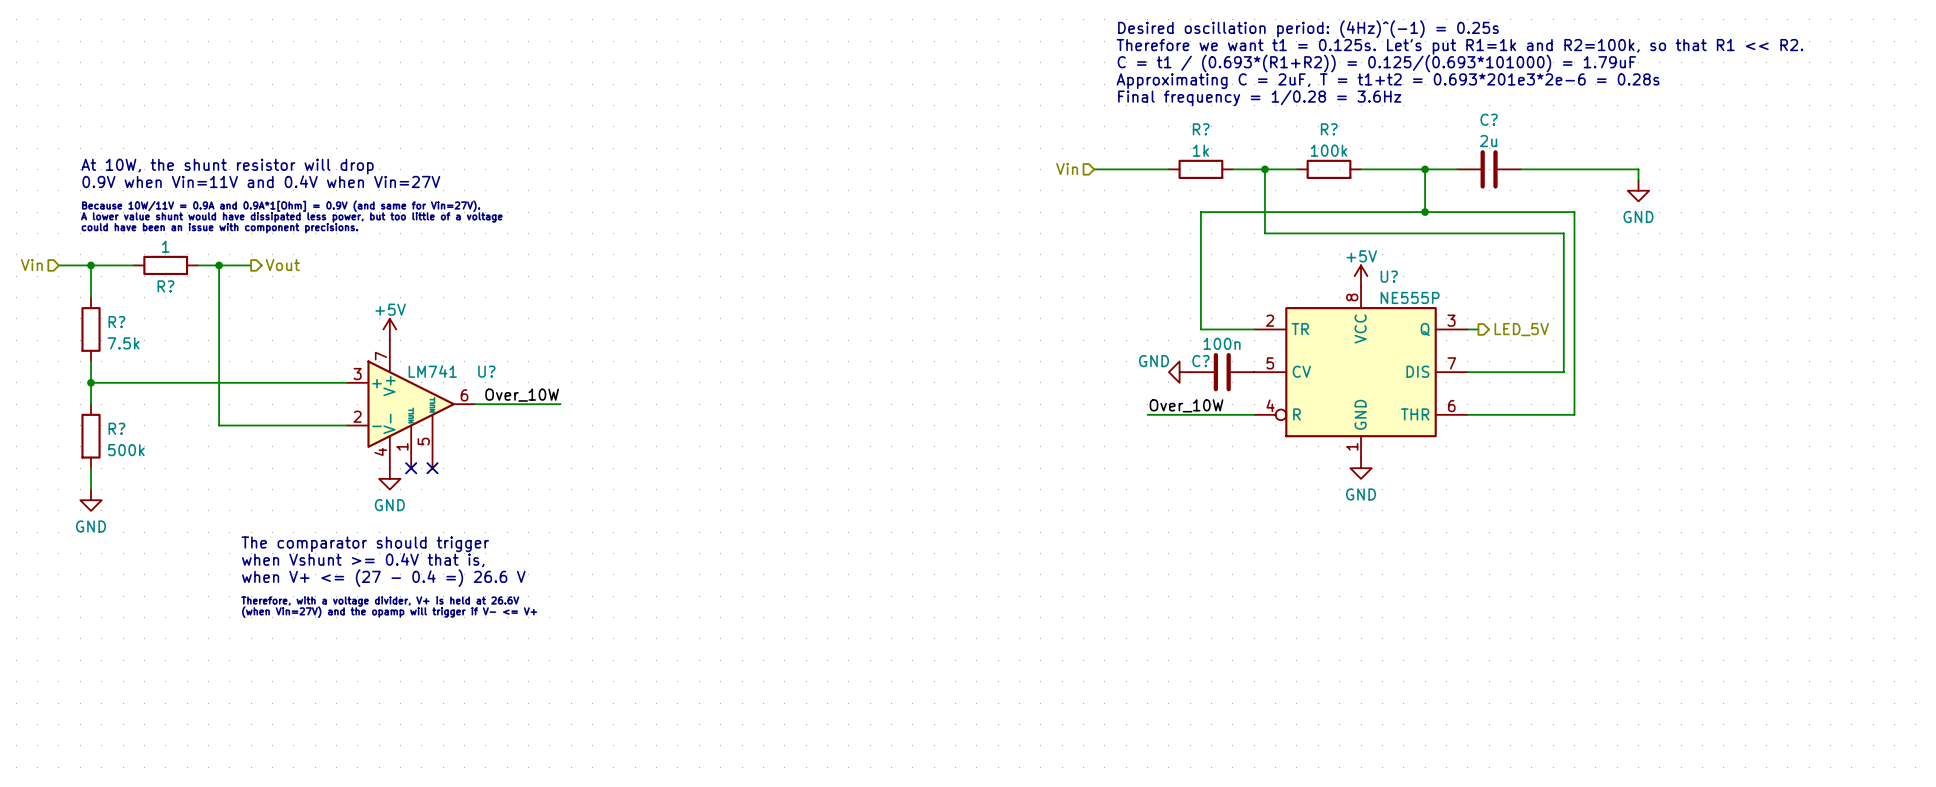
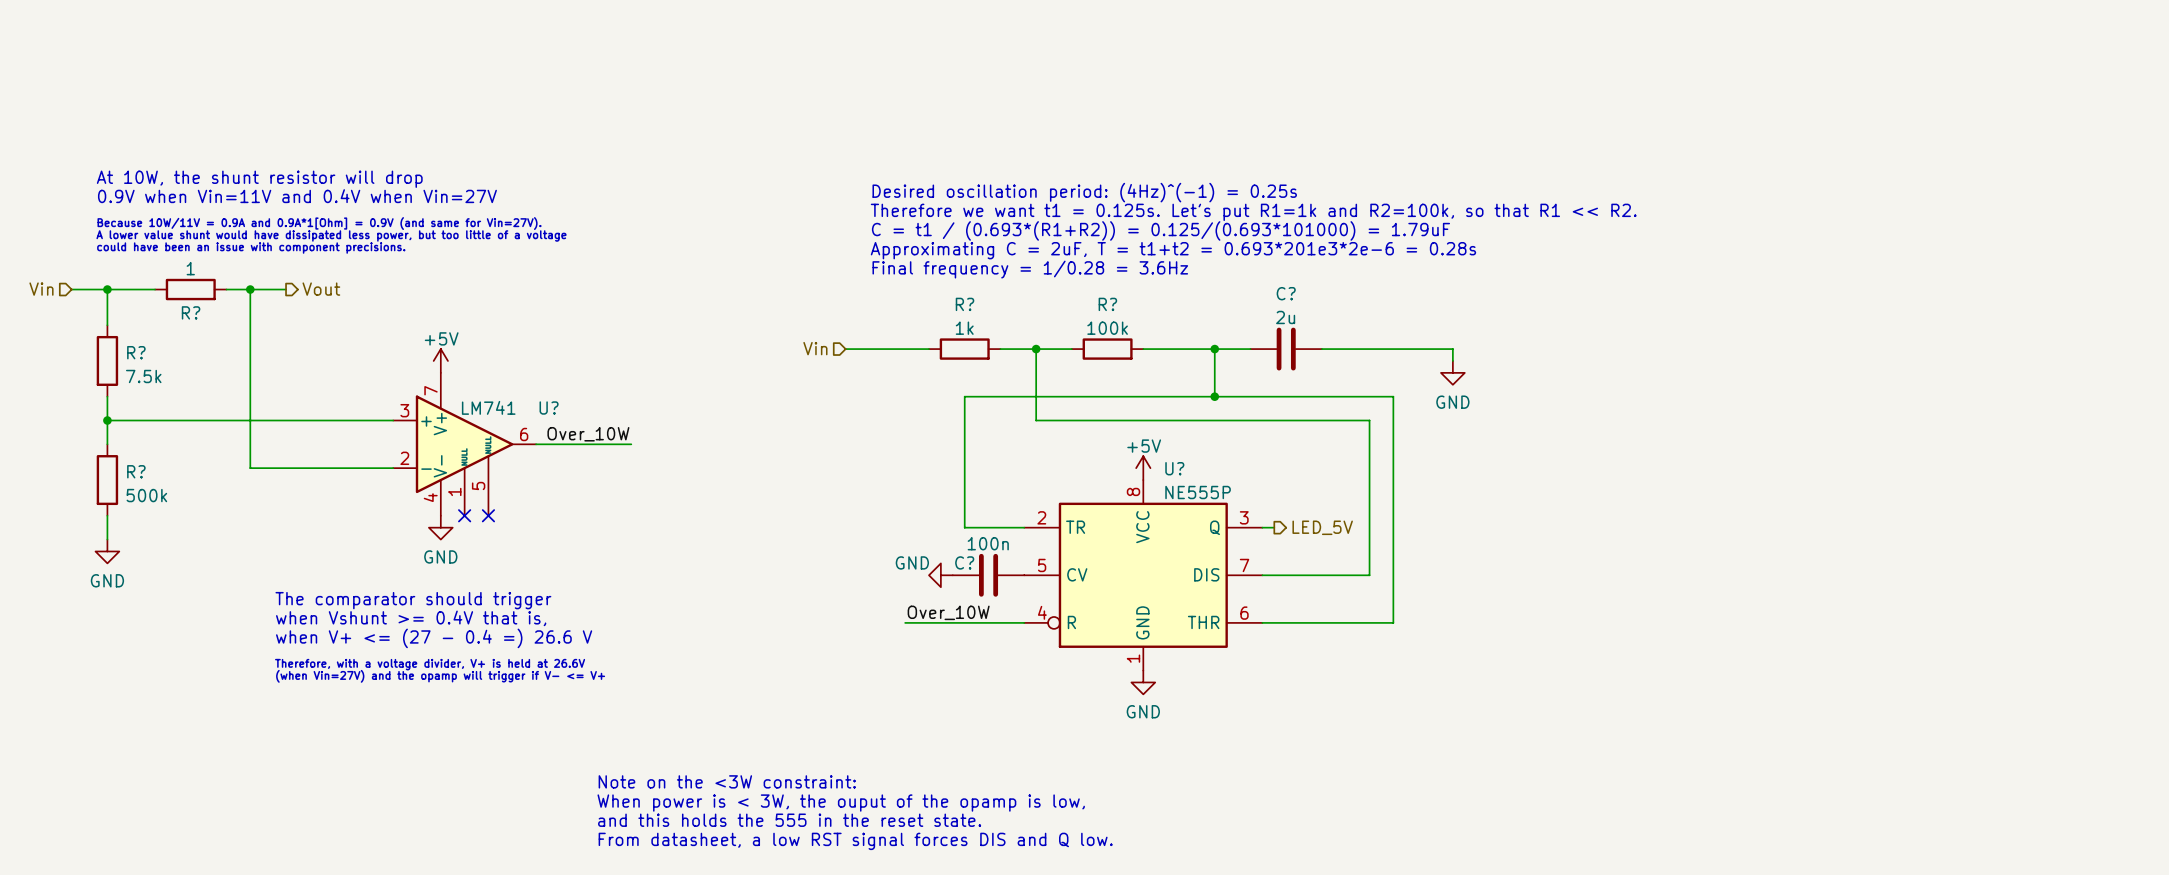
text: Desired oscillation period: (4Hz)^(-1) = 0.25s (1308, 29) -> none
text: Therefore we want t1 = 0.125s. Let's put R1=1k and R2=100k, so that R1 << R2. (1459, 46) -> none
text: C = t1 / (0.693*(R1+R2)) = 0.125/(0.693*101000) = 1.79uF (1376, 63) -> none
text: Approximating C = 2uF, T = t1+t2 = 0.693*201e3*2e-6 = 0.28s (1388, 81) -> none
text: Final frequency = 1/0.28 = 3.6Hz (1259, 98) -> none
hierarchical label: Vin (1067, 168) -> none
wire: (1094, 169) (1168, 169) -> none
R?: 1k (1200, 169) -> none
wire: (1232, 169) (1296, 169) -> none
wire: (1264, 169) (1264, 233) (1563, 233) (1563, 372) (1467, 372) -> none
junction: (1264, 169) -> none
R?: 100k (1329, 169) -> none
wire: (1361, 169) (1457, 169) -> none
wire: (1425, 169) (1425, 212) -> none
junction: (1425, 169) -> none
C?: 2u (1489, 169) -> none
wire: (1521, 169) (1638, 169) (1638, 180) -> none
text: none -> Desired oscillation period: (4Hz)^(-1) = 0.25s (1084, 192)
power symbol: GND (1638, 190) -> none
text: none -> Therefore we want t1 = 0.125s. Let's put R1=1k and R2=100k, so that R1 << R2. (1253, 212)
text: none -> C = t1 / (0.693*(R1+R2)) = 0.125/(0.693*101000) = 1.79uF (1160, 230)
junction: (1425, 212) -> none
text: none -> Approximating C = 2uF, T = t1+t2 = 0.693*201e3*2e-6 = 0.28s (1173, 250)
text: none -> Final frequency = 1/0.28 = 3.6Hz (1030, 269)
power symbol: +5V (1361, 276) -> none
hierarchical label: none -> Vin (815, 348)
wire: none -> (845, 349) (928, 349)
R?: none -> 1k (964, 349)
wire: none -> (1000, 349) (1071, 349)
wire: none -> (1036, 349) (1036, 420) (1369, 420) (1369, 575) (1262, 575)
junction: none -> (1036, 349)
R?: none -> 100k (1107, 349)
wire: none -> (1143, 349) (1250, 349)
wire: none -> (1214, 349) (1214, 396)
junction: none -> (1214, 349)
C?: none -> 2u (1286, 349)
wire: none -> (1321, 349) (1452, 349) (1452, 360)
wire: (1254, 329) (1200, 329) (1200, 212) (1574, 212) (1574, 414) (1467, 414) -> none
wire: (1467, 329) (1478, 329) -> none
hierarchical label: LED_5V (1521, 329) -> none
power symbol: none -> GND (1452, 372)
junction: none -> (1214, 396)
power symbol: GND (1179, 372) -> none
C?: 100n (1222, 372) -> none
U?: NE555P (1361, 372) -> none
label: Over_10W (1186, 405) -> none
wire: (1147, 414) (1254, 414) -> none
power symbol: none -> +5V (1143, 468)
power symbol: GND (1361, 468) -> none
wire: none -> (1024, 527) (964, 527) (964, 396) (1393, 396) (1393, 622) (1262, 622)
wire: none -> (1262, 527) (1274, 527)
hierarchical label: none -> LED_5V (1322, 527)
power symbol: none -> GND (940, 575)
C?: none -> 100n (988, 575)
U?: none -> NE555P (1143, 575)
label: none -> Over_10W (948, 612)
wire: none -> (905, 622) (1024, 622)
power symbol: none -> GND (1143, 682)
text: none -> Note on the <3W constraint: (727, 781)
text: none -> When power is < 3W, the ouput of the opamp is low, (841, 803)
text: none -> and this holds the 555 in the reset state. (789, 820)
text: none -> From datasheet, a low RST signal forces DIS and Q low. (855, 841)

